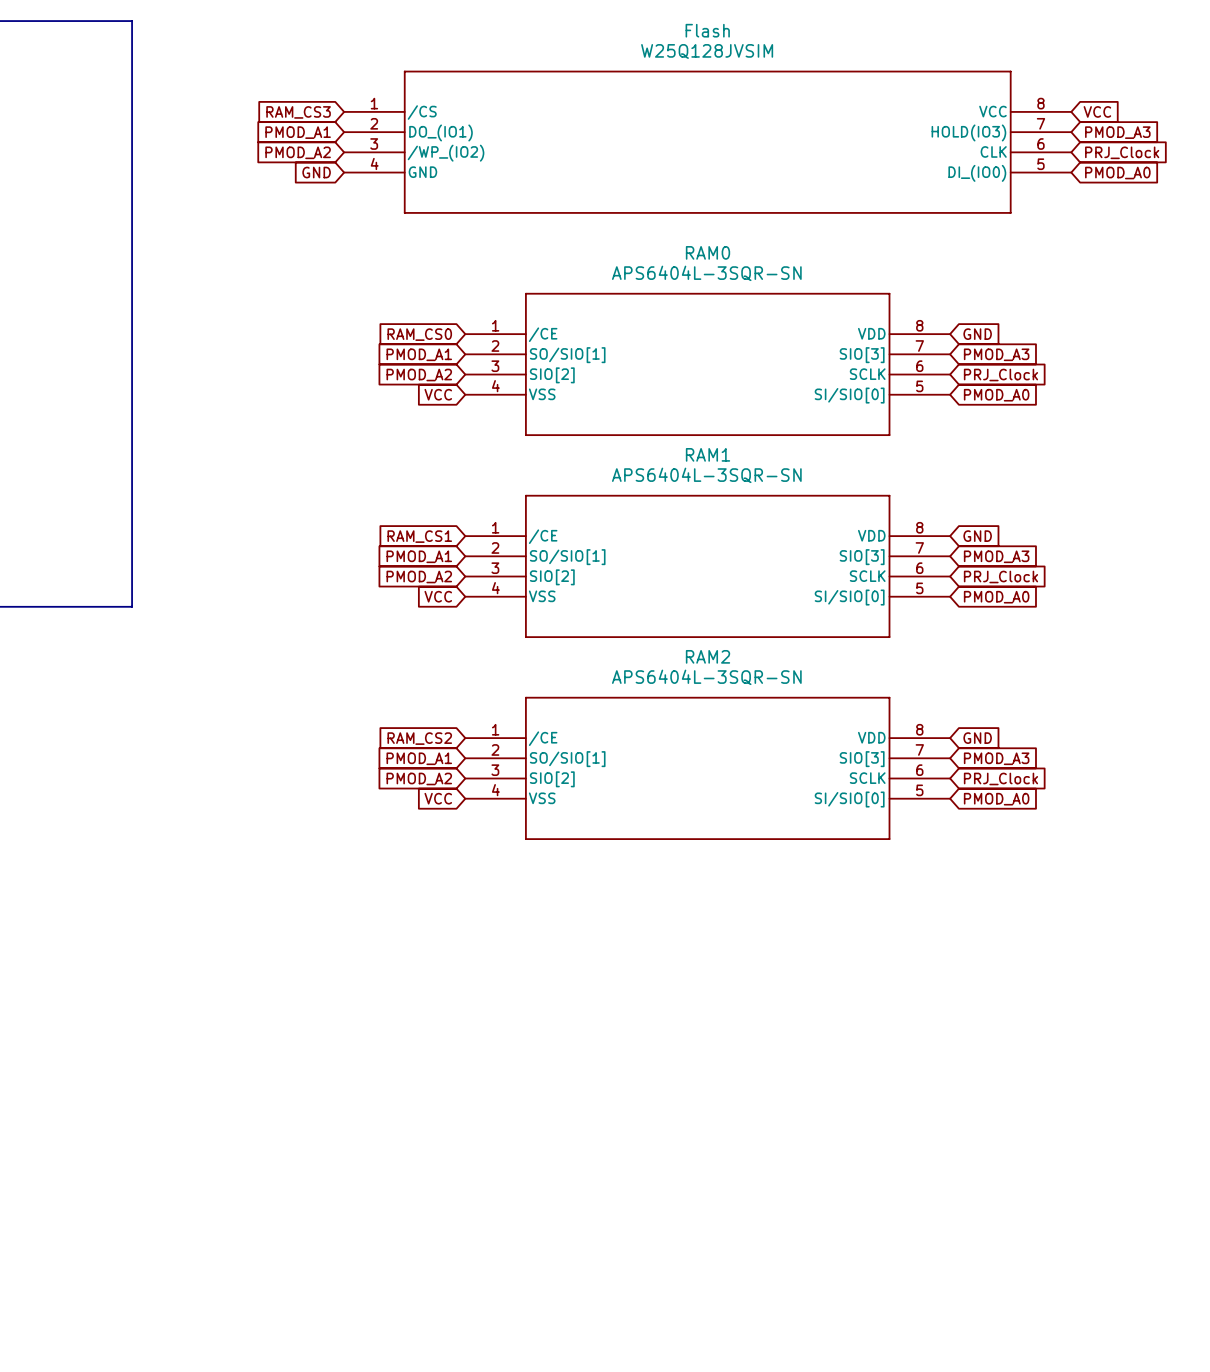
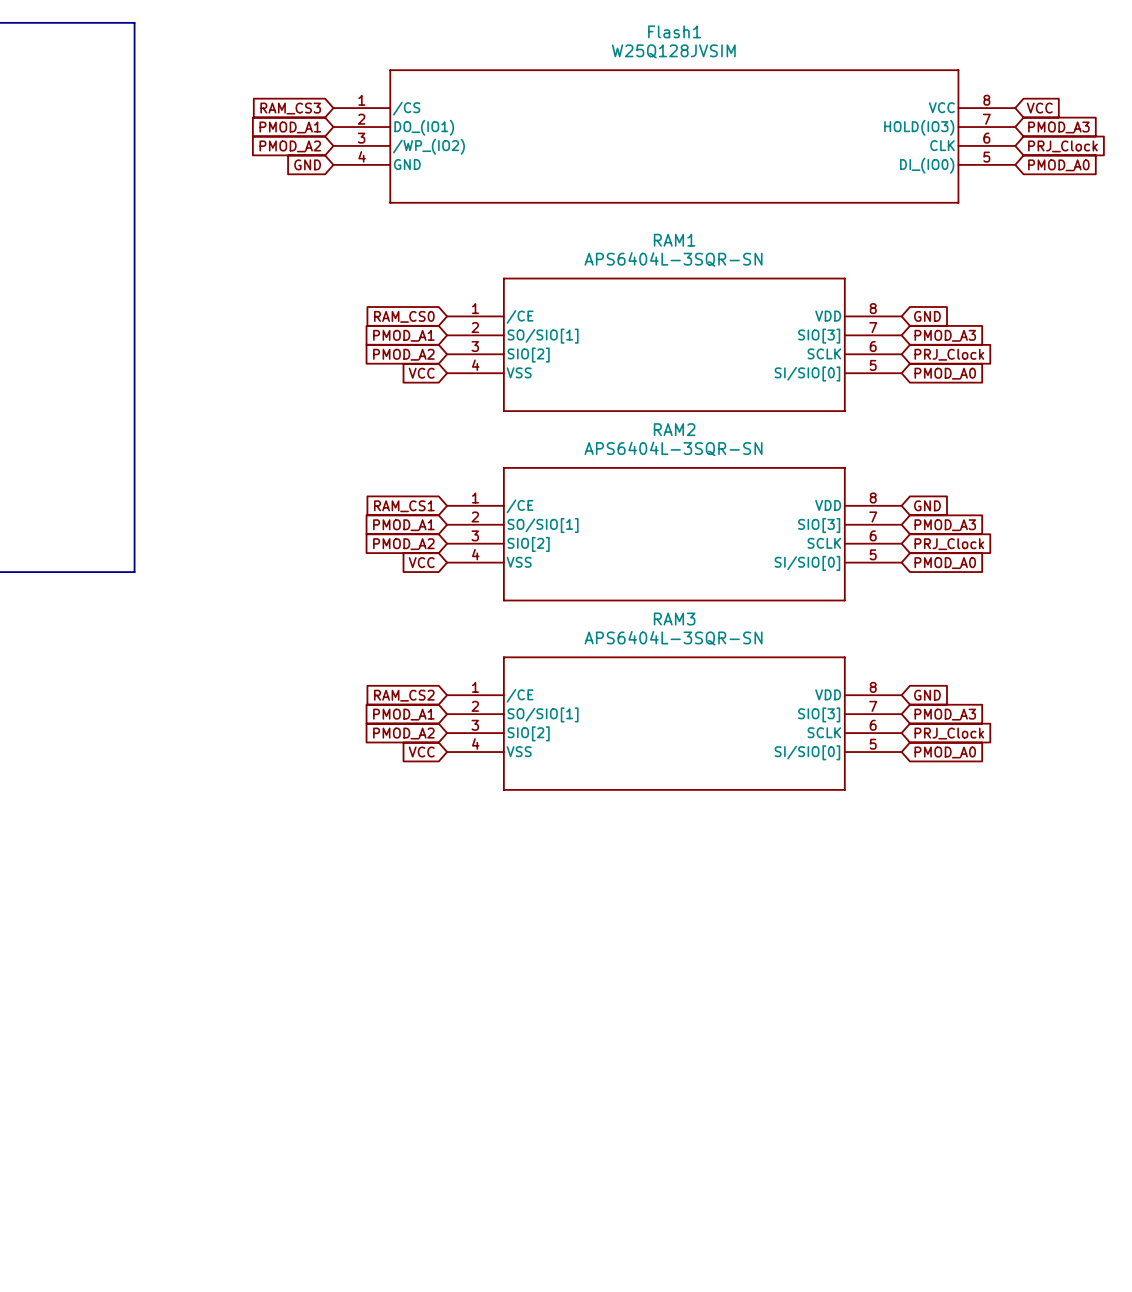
Flash name: Flash (707, 30) -> Flash1 (674, 31)
RAM0 name: RAM0 (708, 252) -> RAM1 (674, 240)
RAM1 name: RAM1 (708, 454) -> RAM2 (674, 429)
RAM2 name: RAM2 (708, 656) -> RAM3 (674, 619)

